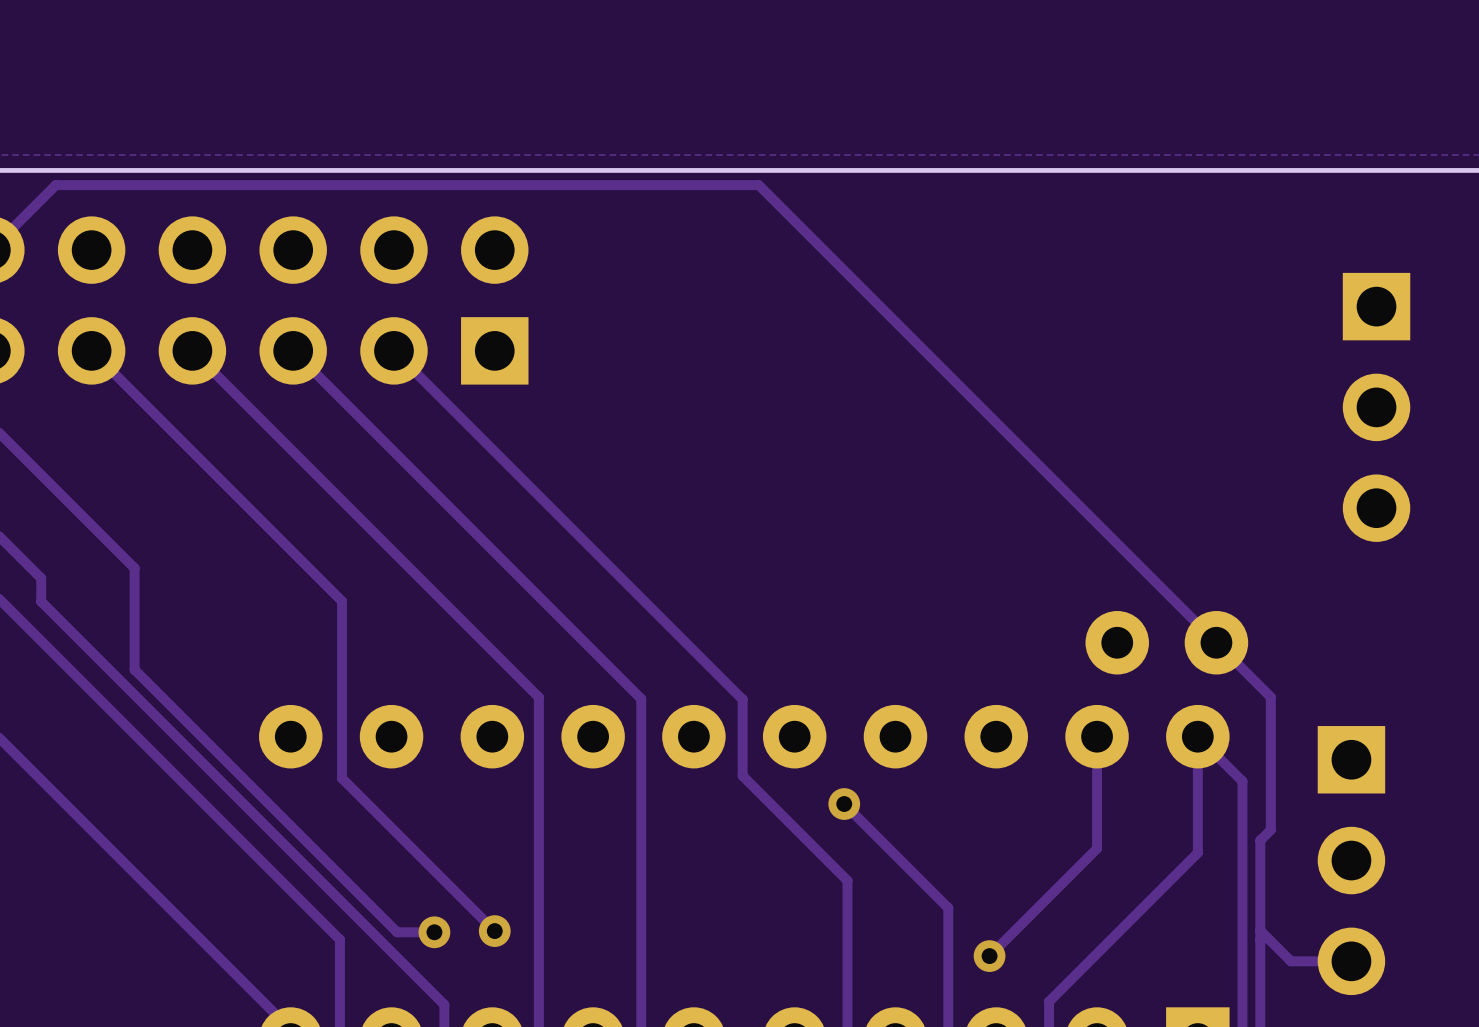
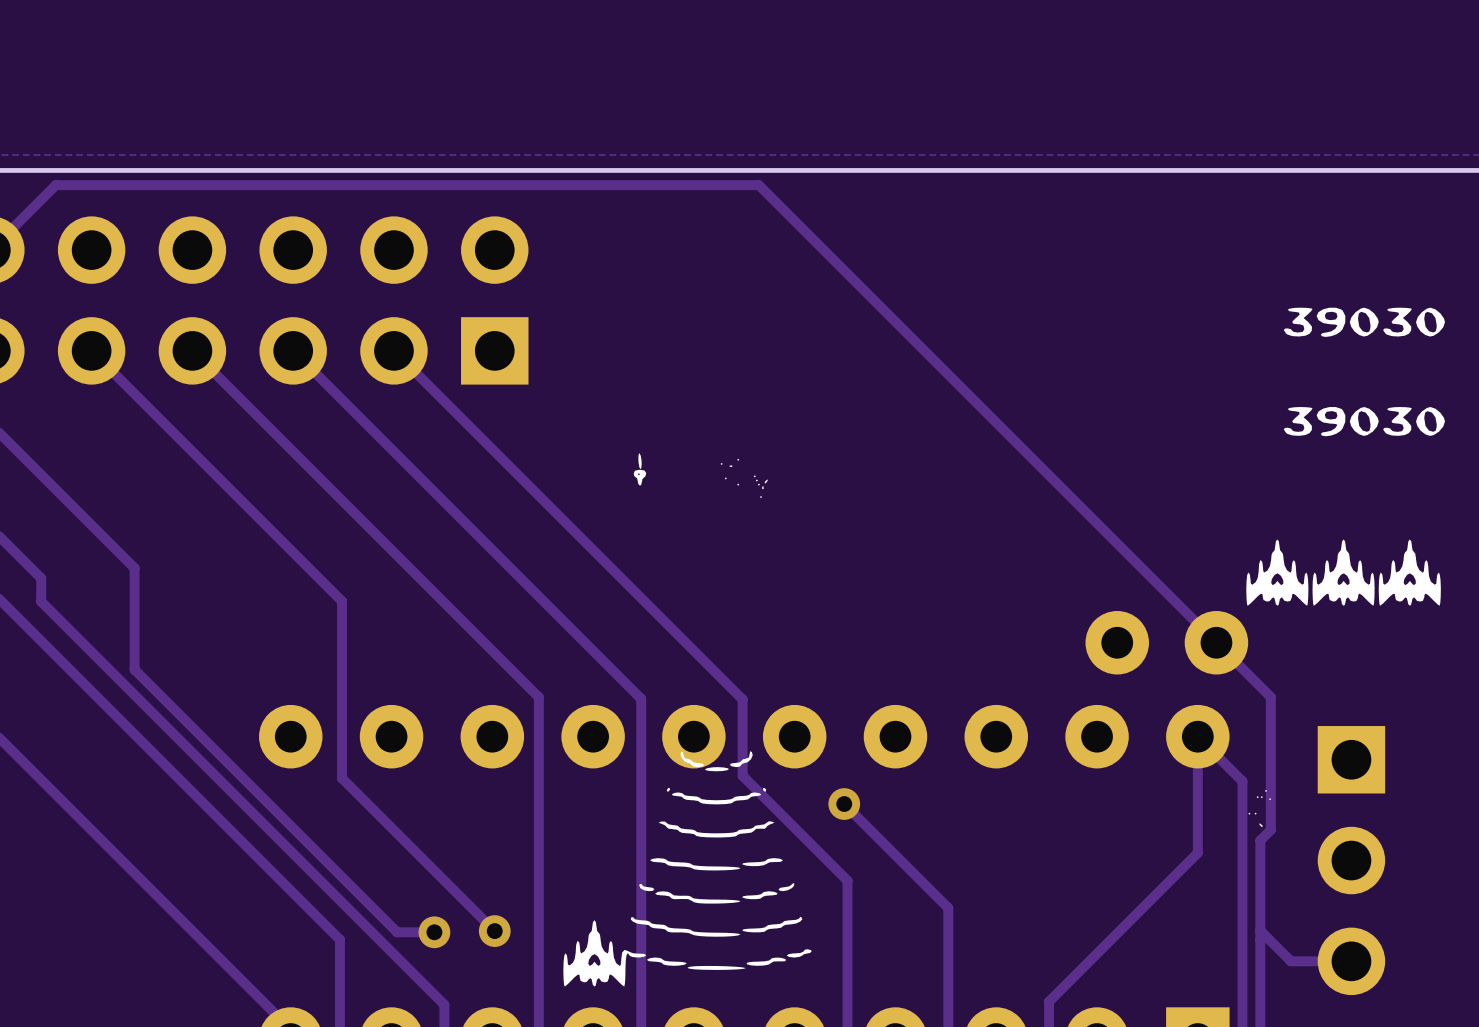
drawing: none -> [563, 307, 1445, 987]
part: (1376, 407) -> none
track: (1097, 736) (1097, 848) (989, 956) -> none
via: (989, 956) -> none

